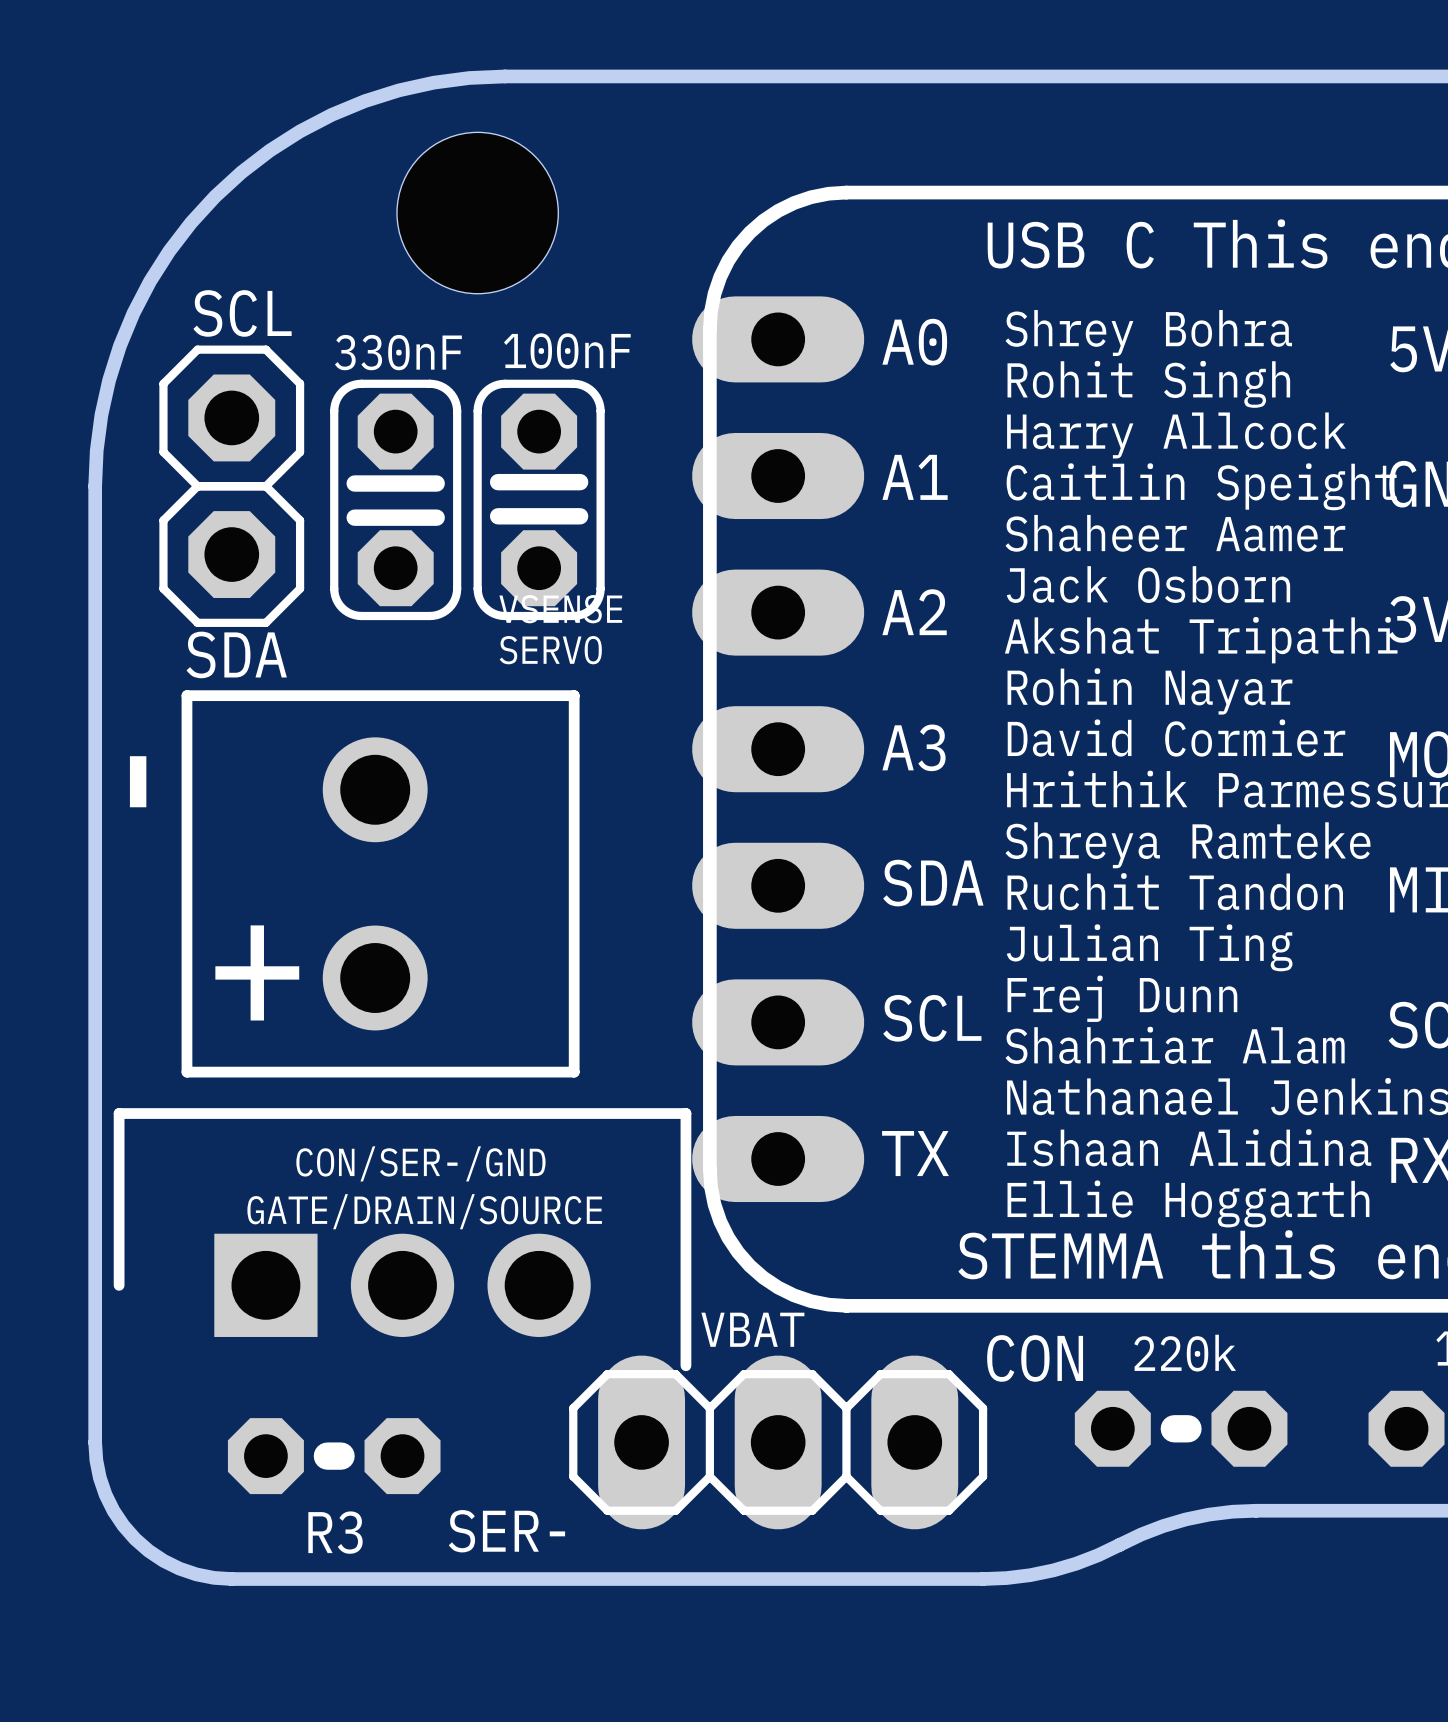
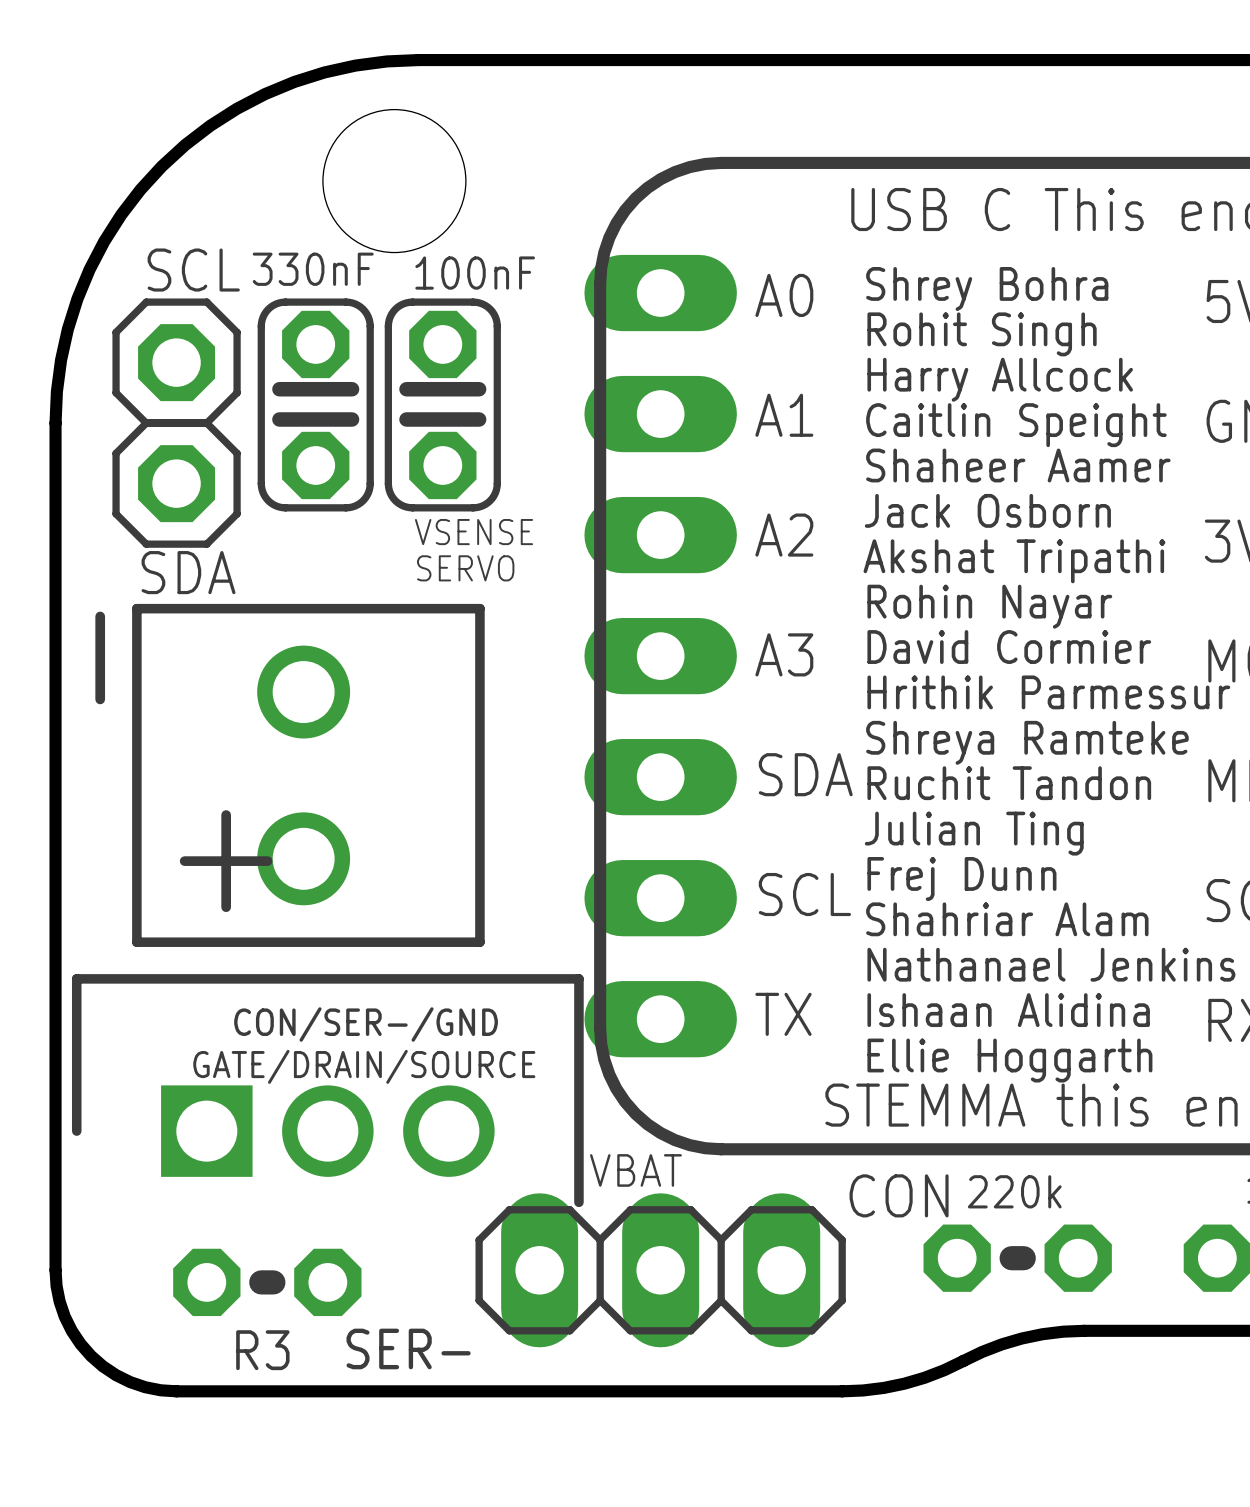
part rotation: 0° (395, 499) -> 180° (315, 404)
part position: (539, 499) -> (442, 404)

